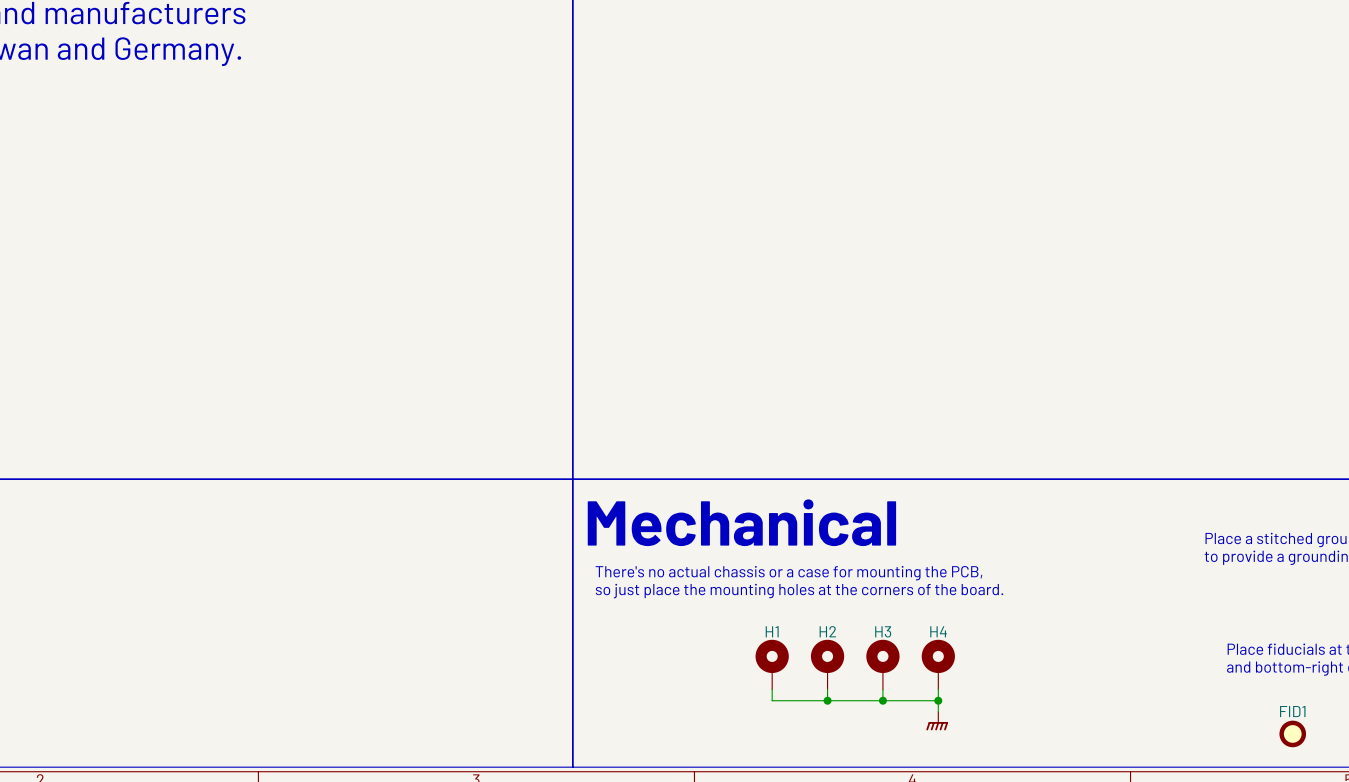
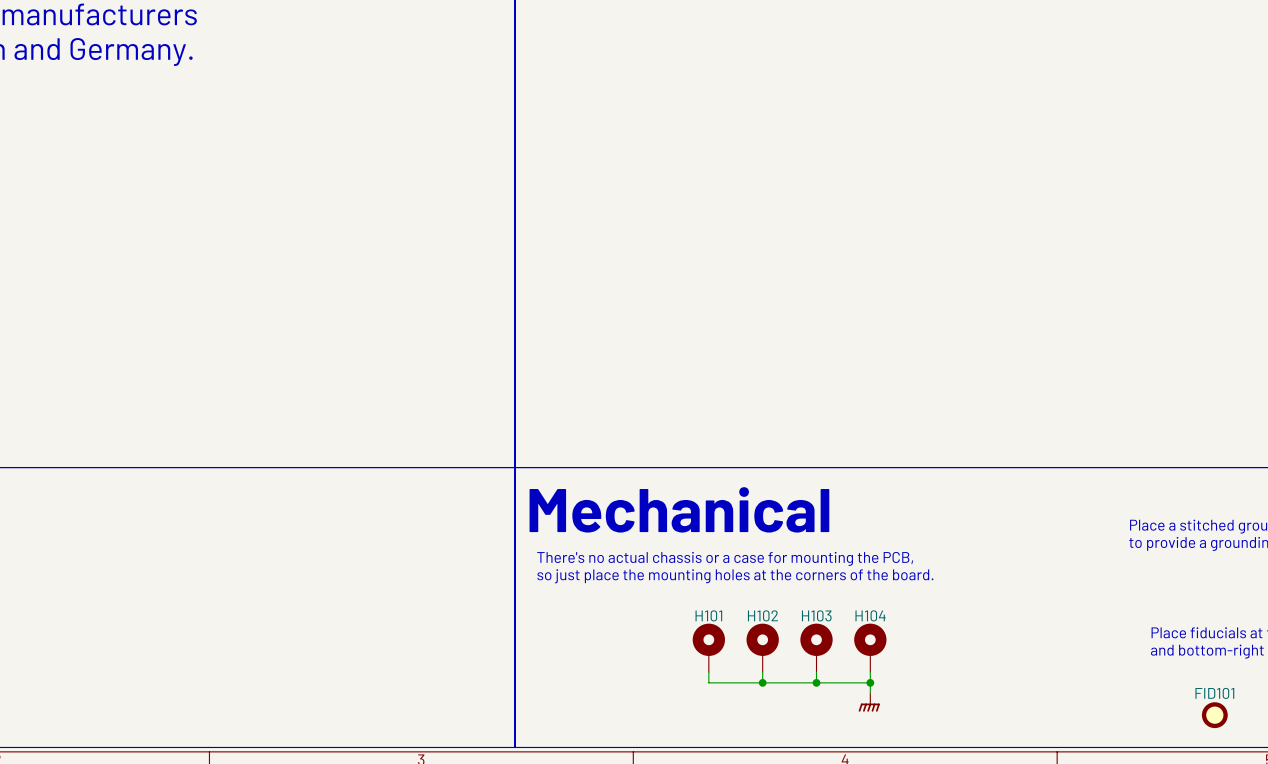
H1 name: H1 (772, 631) -> H101 (708, 615)
H2 name: H2 (827, 631) -> H102 (762, 615)
H3 name: H3 (883, 631) -> H103 (816, 615)
H4 name: H4 (938, 631) -> H104 (870, 615)
FID1 name: FID1 (1292, 711) -> FID101 (1214, 693)

